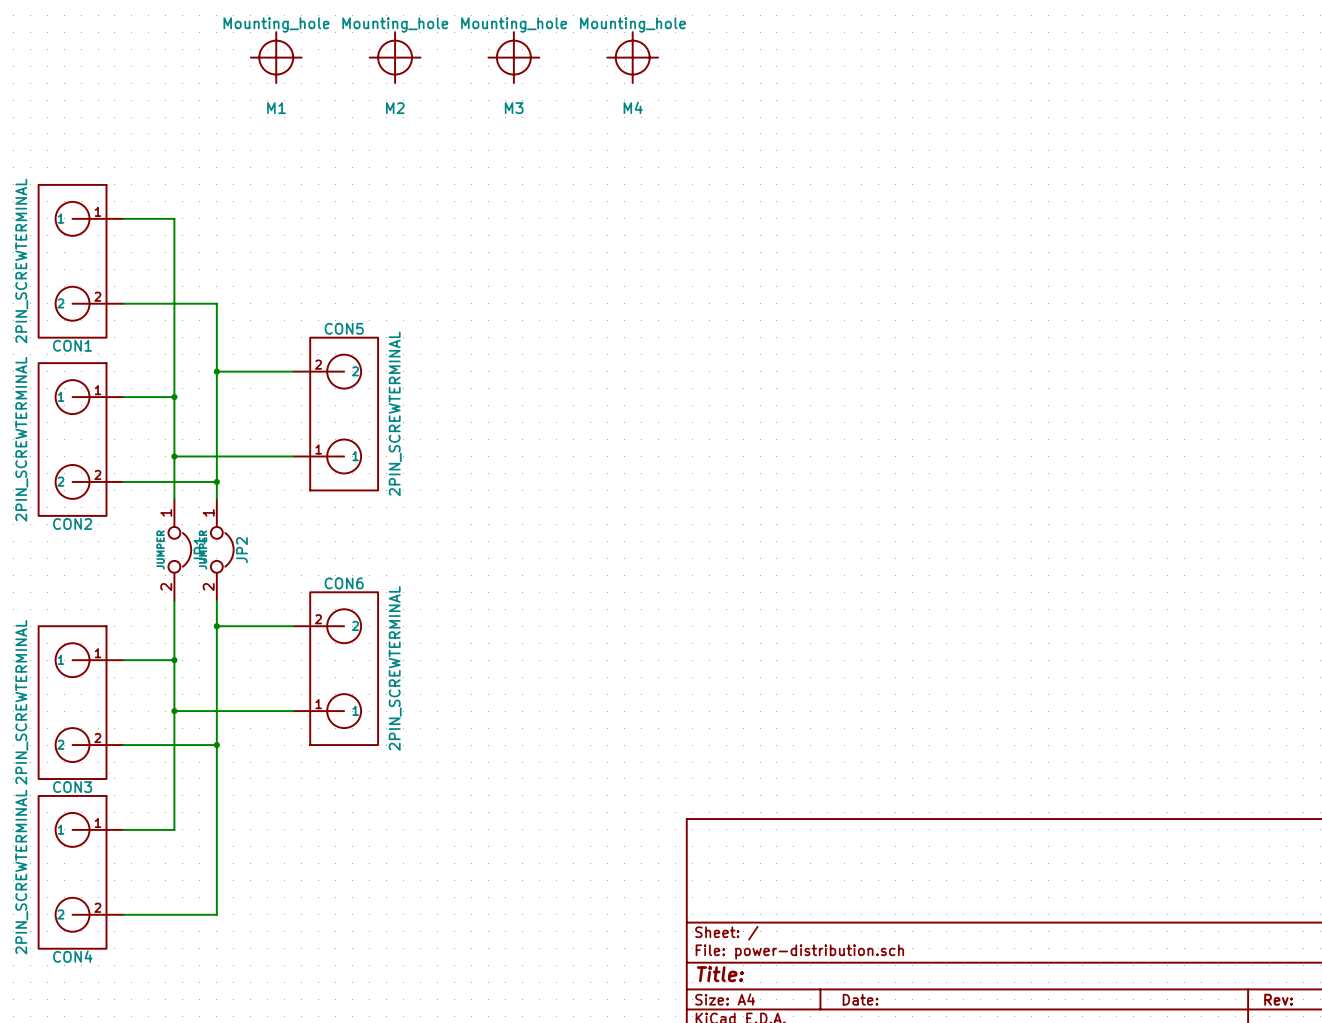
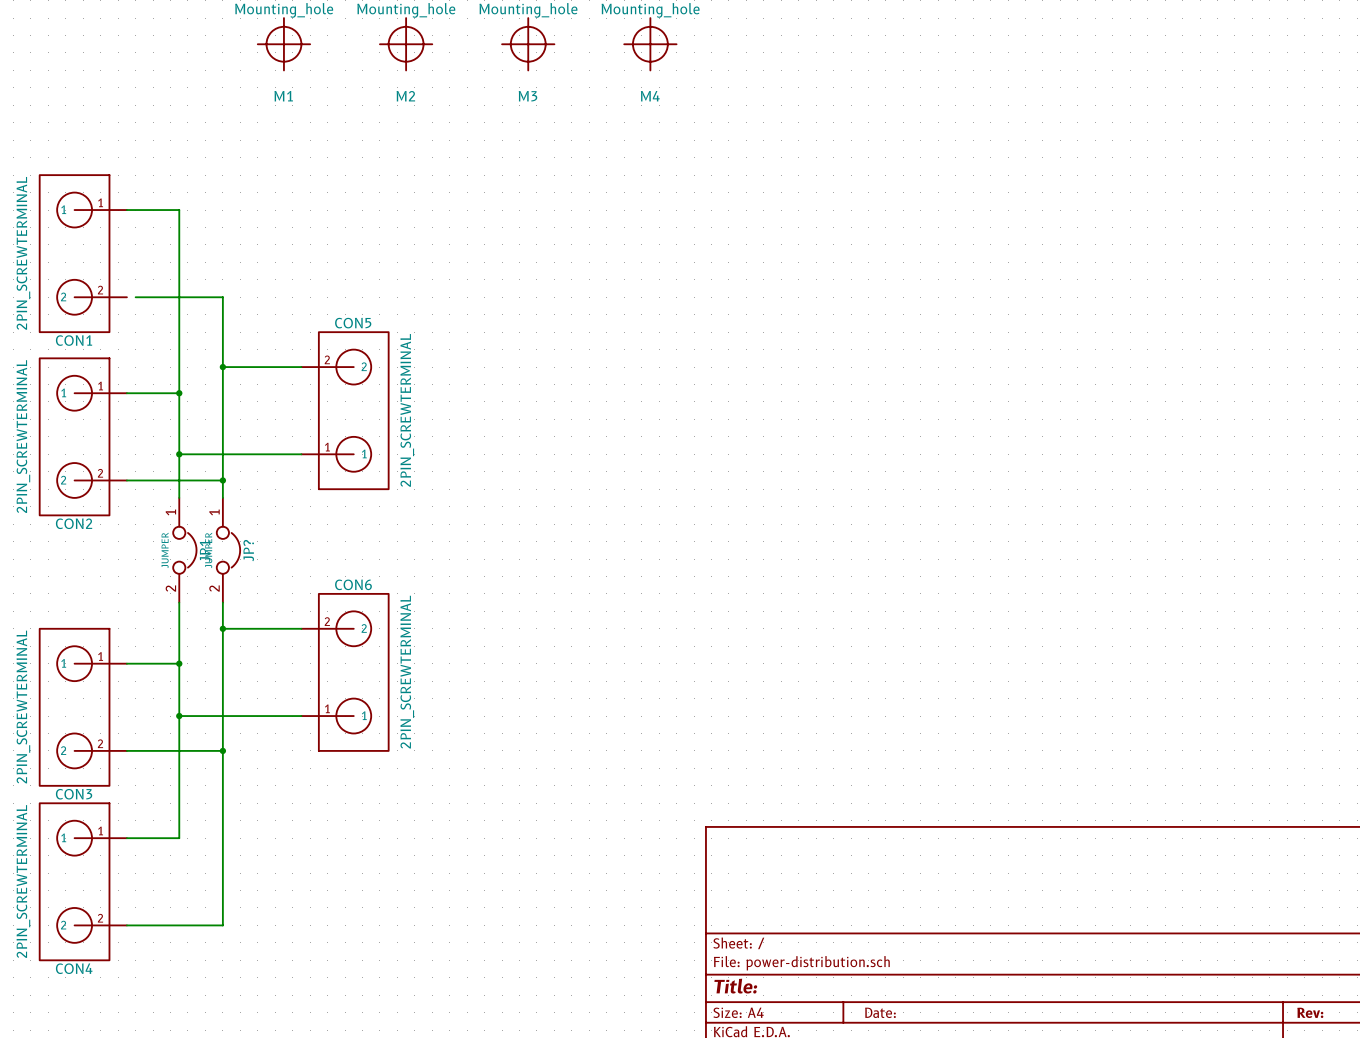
wire: (123, 303) (131, 303) -> none
JP2 name: JP2 (241, 550) -> JP? (248, 550)

